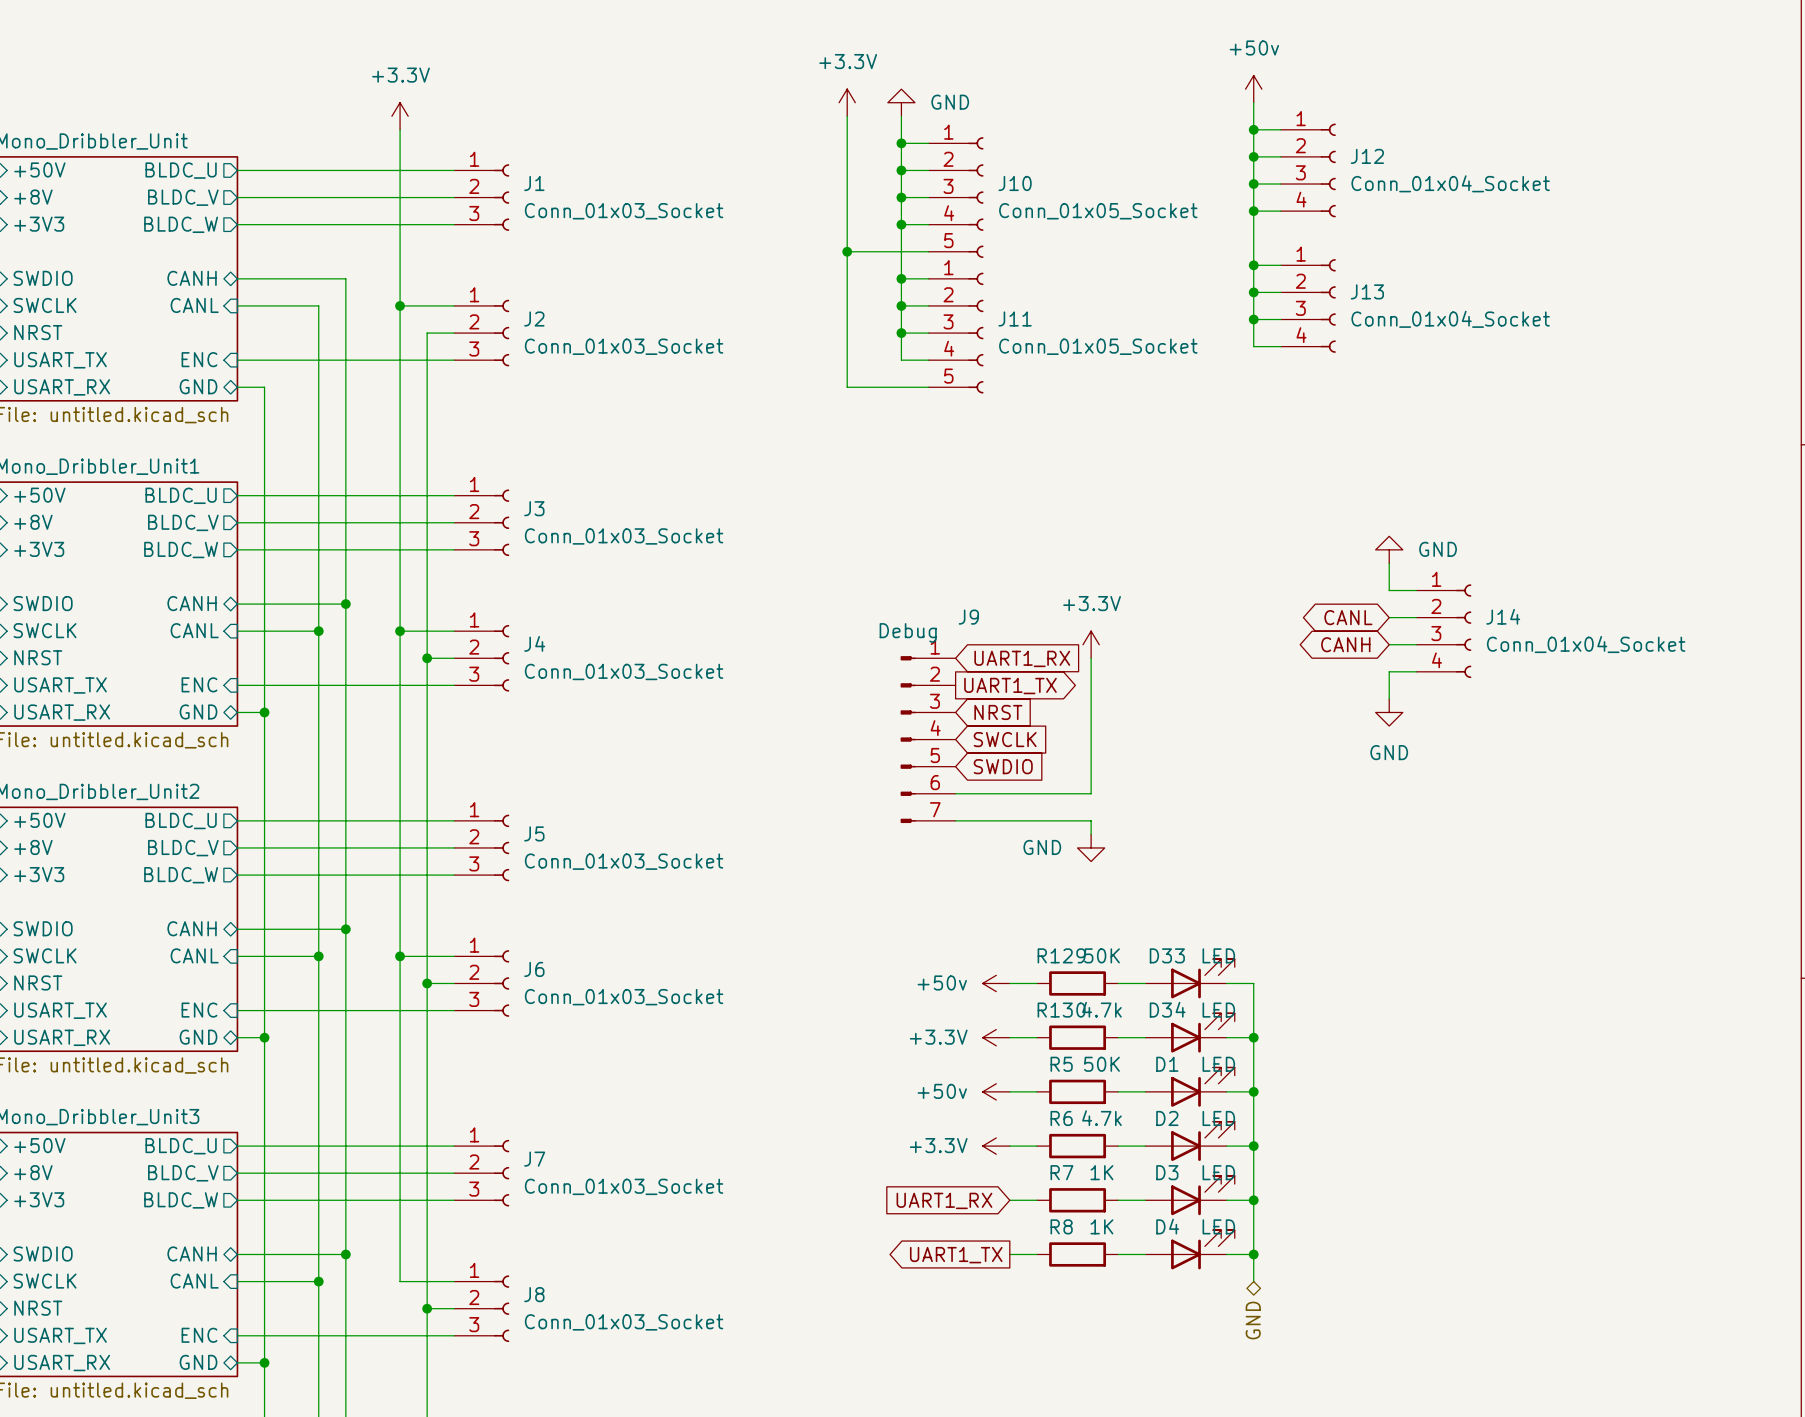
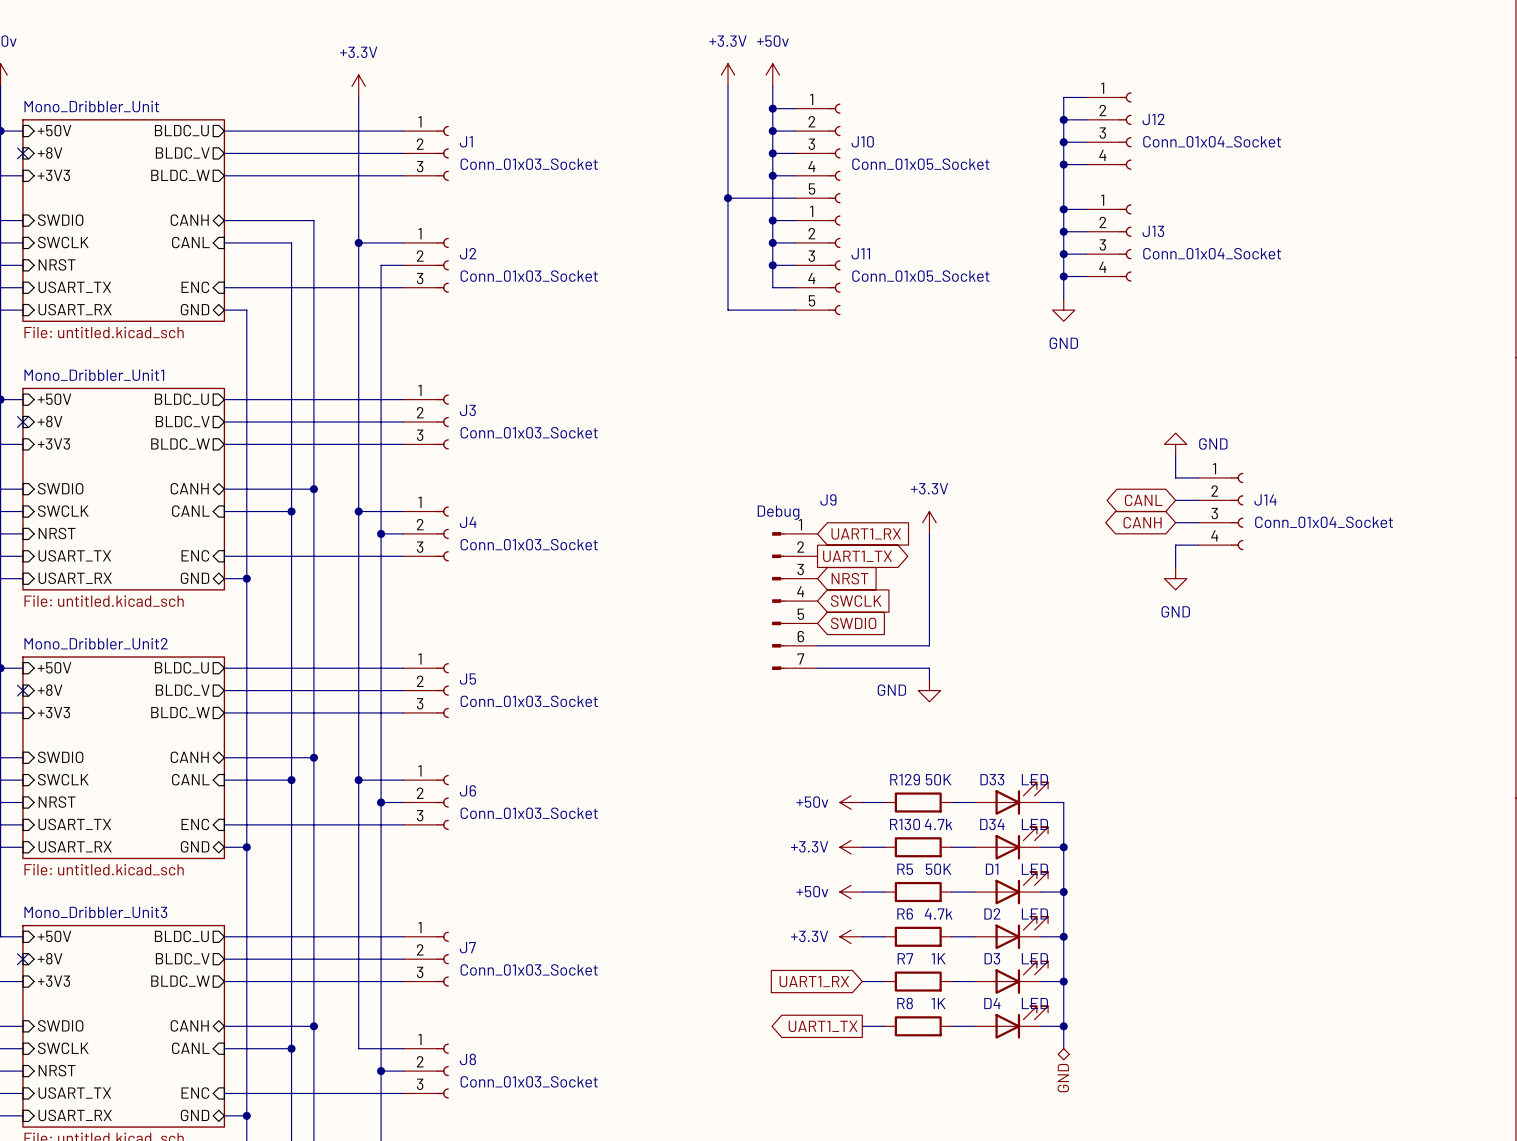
power symbol: +50v (1253, 89) -> none
power symbol: GND (901, 102) -> +50v (772, 75)
wire: (1253, 102) (1253, 129) -> (1063, 276) (1063, 298)
junction: (1253, 129) -> none
junction: none -> (1063, 276)
power symbol: none -> GND (1063, 310)

